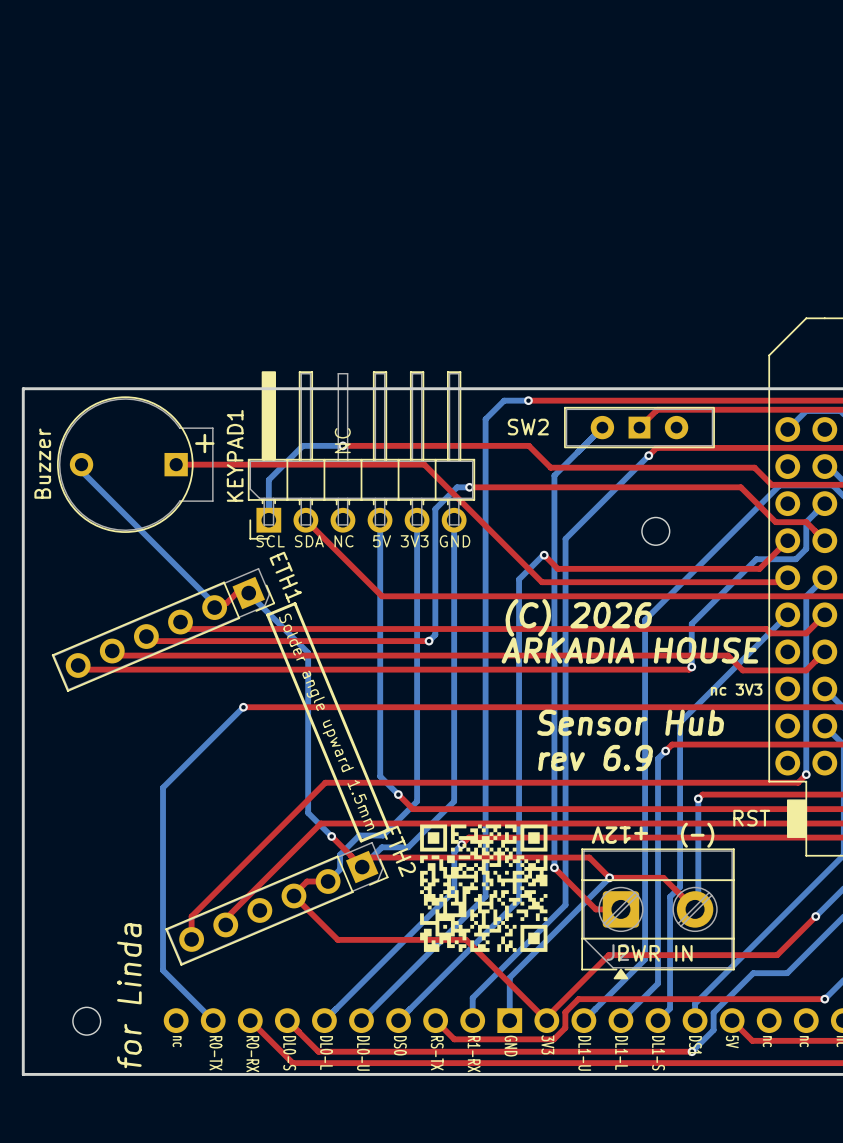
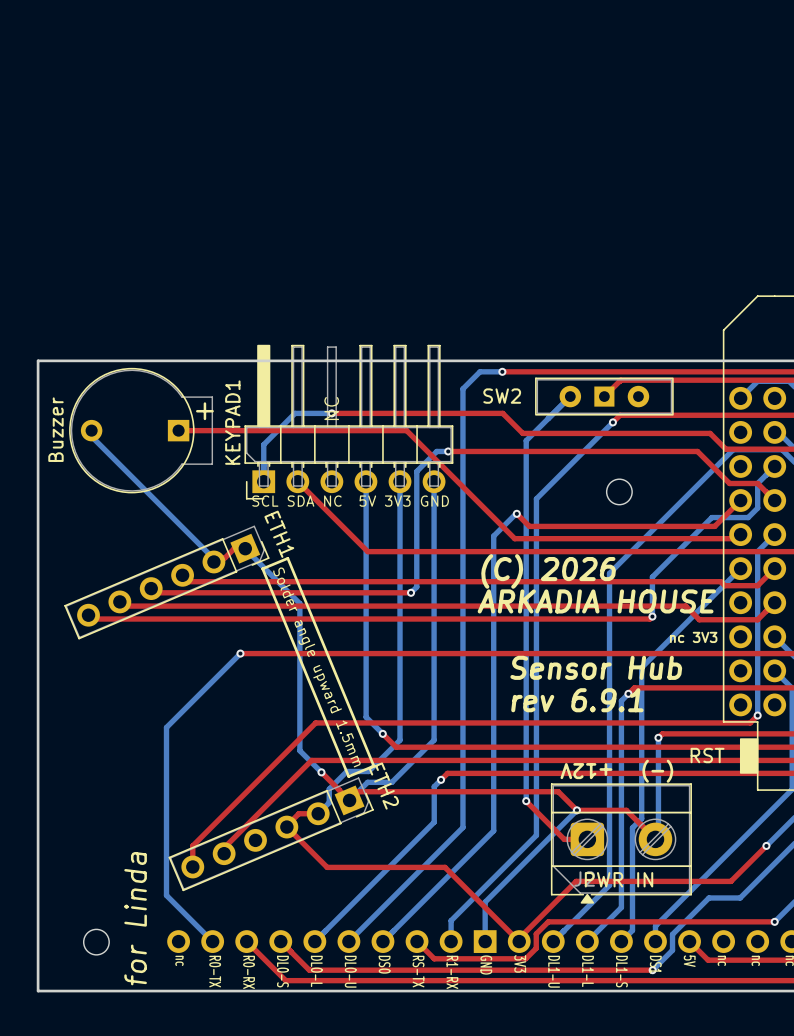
text: rev 6.9 (595, 757) -> rev 6.9.1 (577, 700)
drawing: [420, 824, 548, 952] -> none

